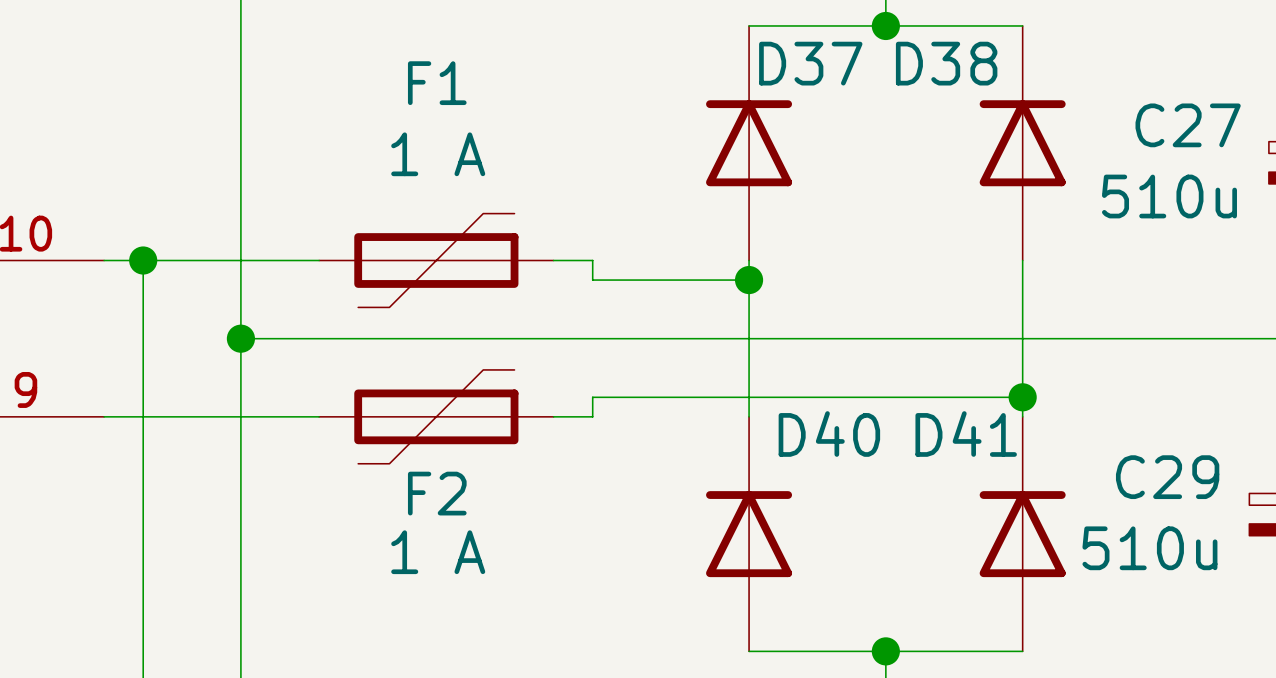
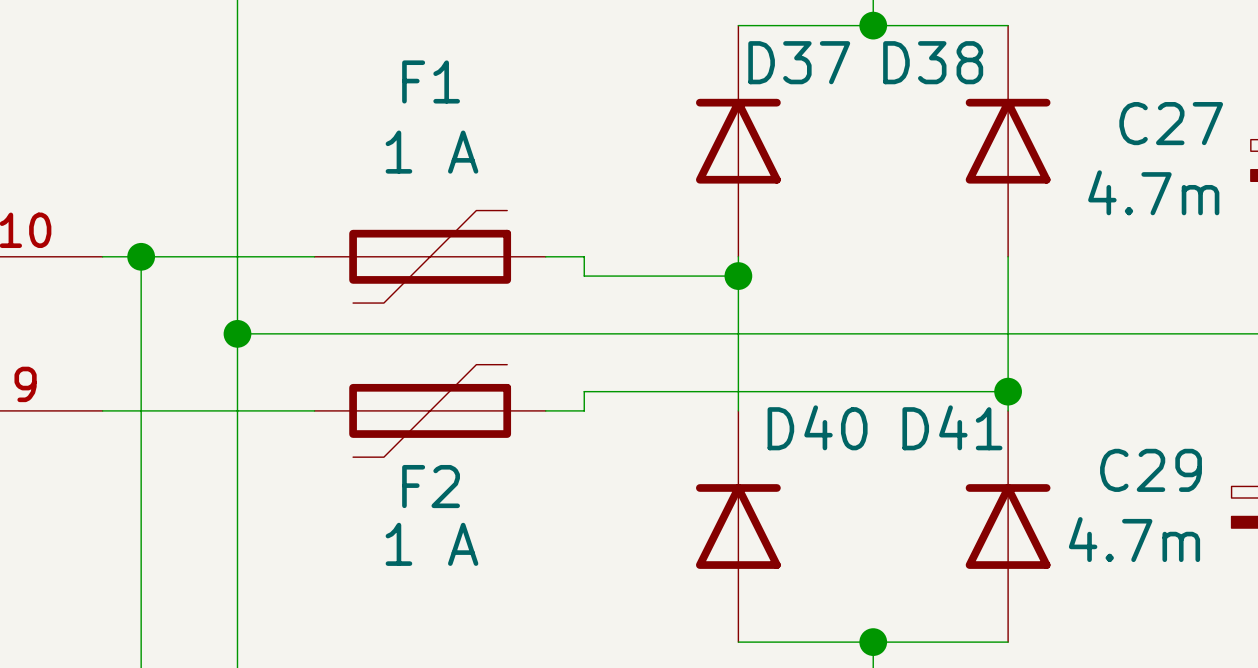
C27 value: 510u (1169, 196) -> 4.7m (1153, 192)
C29 value: 510u (1149, 548) -> 4.7m (1134, 539)

